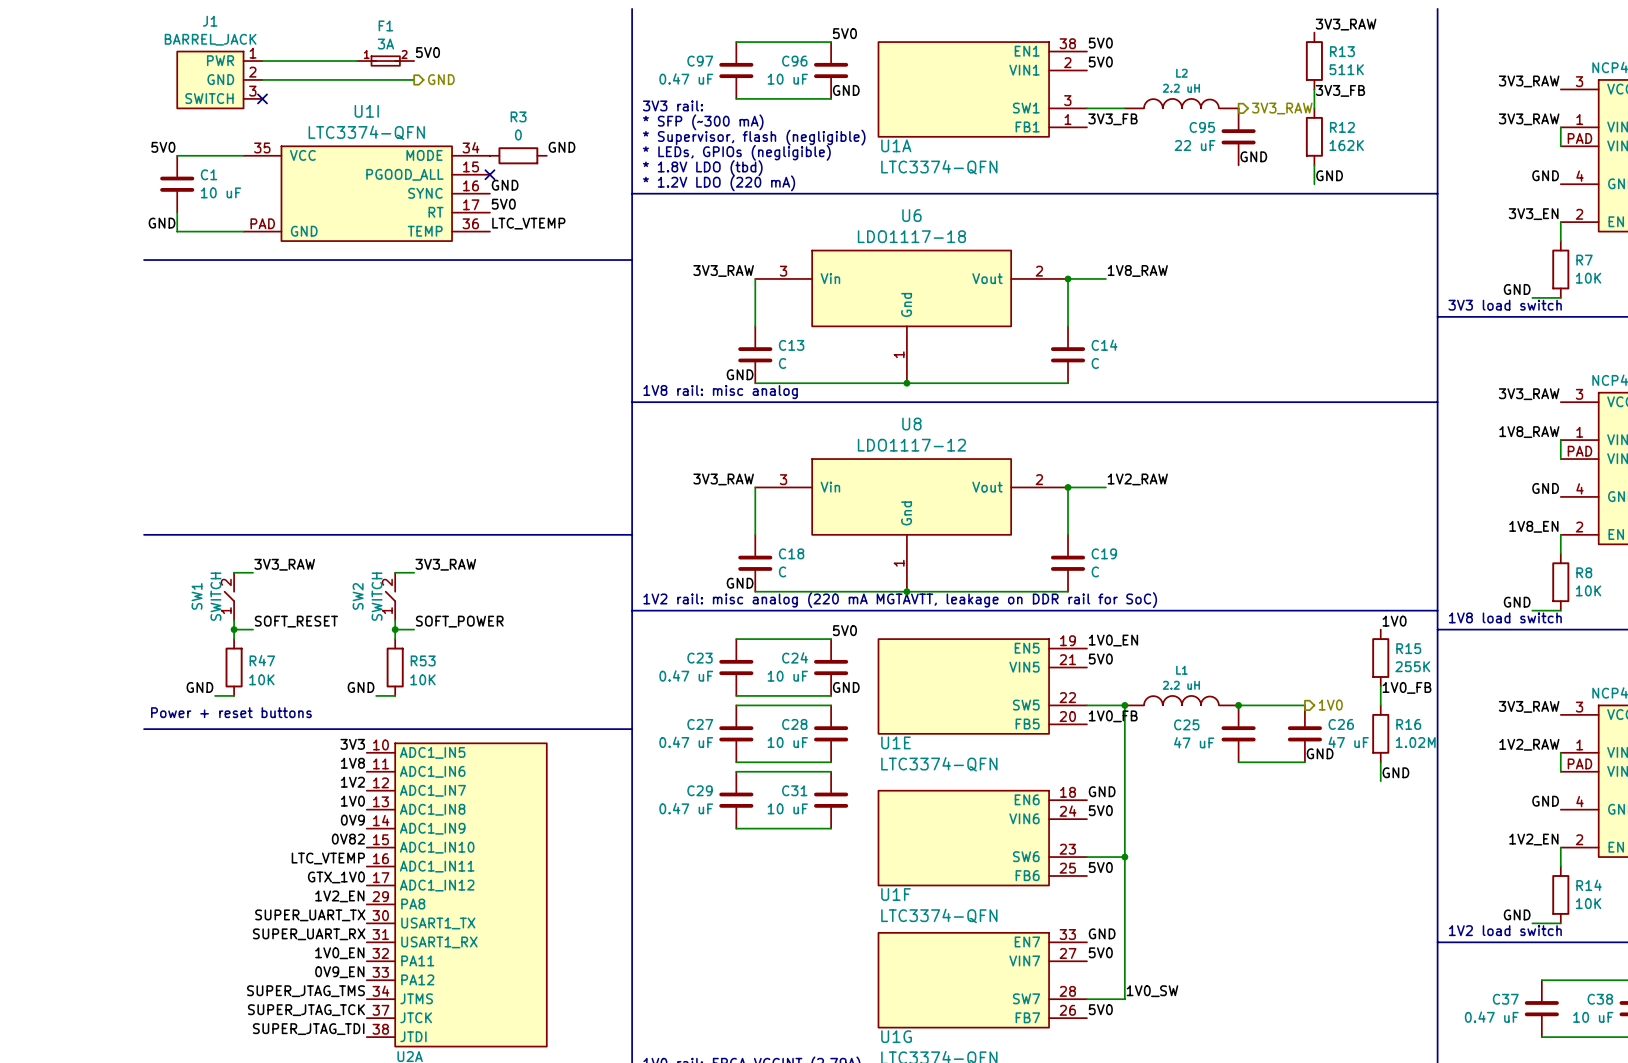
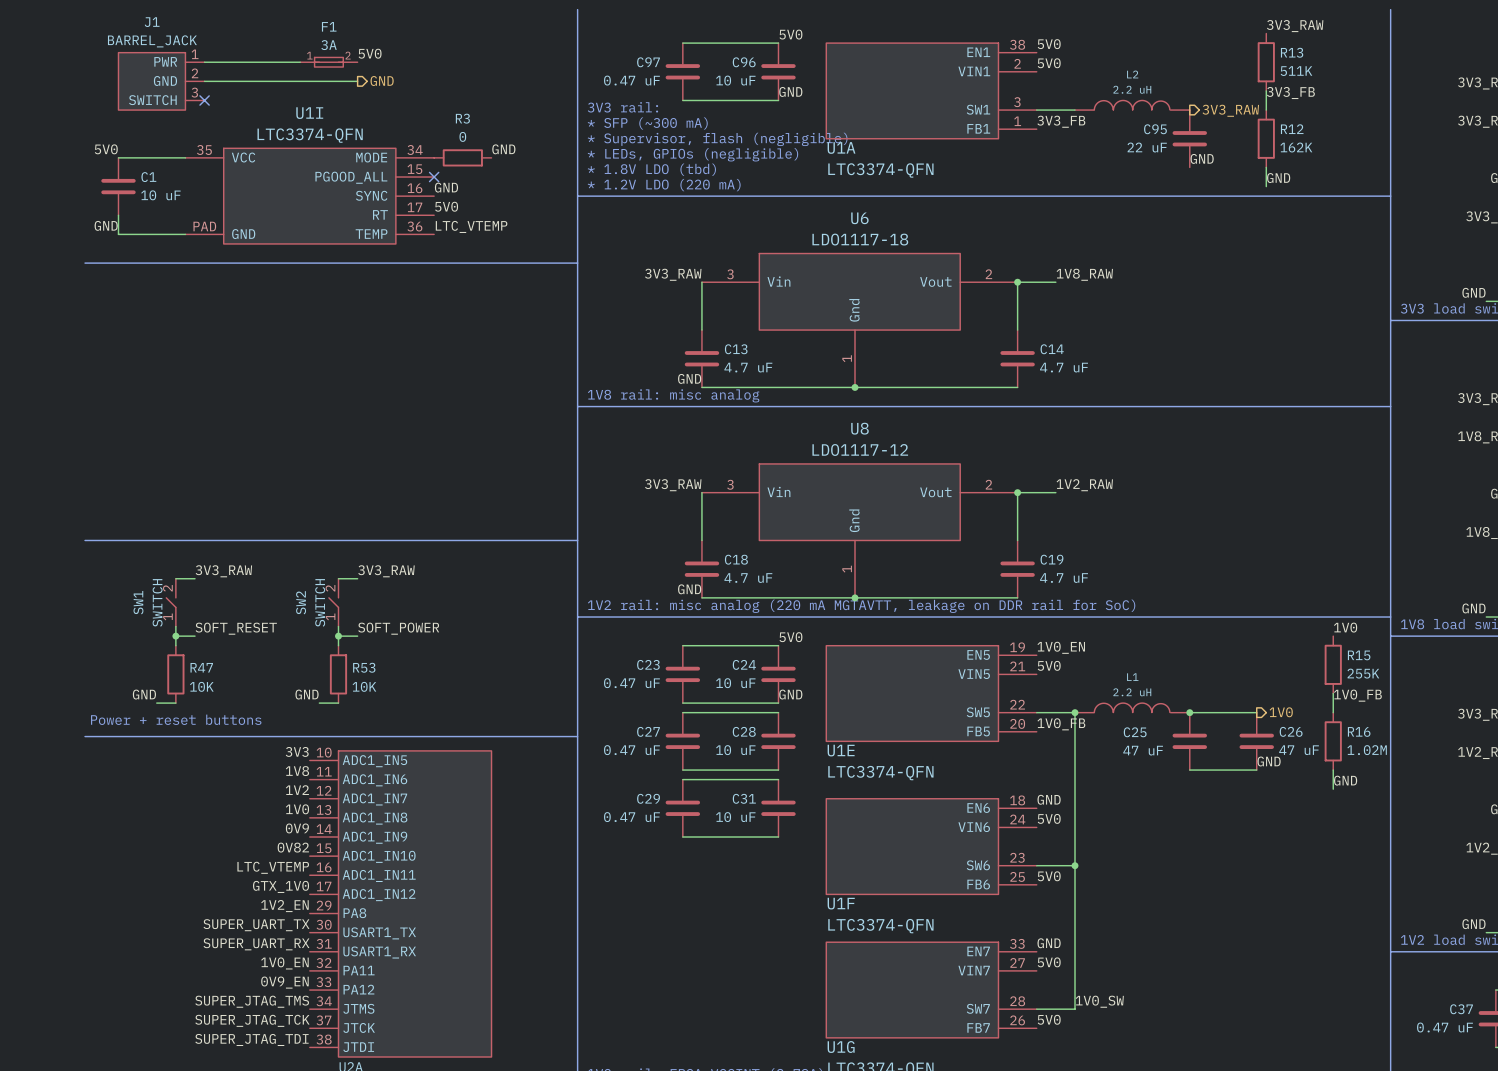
C13 value: C (782, 363) -> 4.7 uF (748, 367)
C14 value: C (1095, 363) -> 4.7 uF (1064, 367)
C18 value: C (782, 571) -> 4.7 uF (748, 578)
C19 value: C (1095, 571) -> 4.7 uF (1064, 578)

